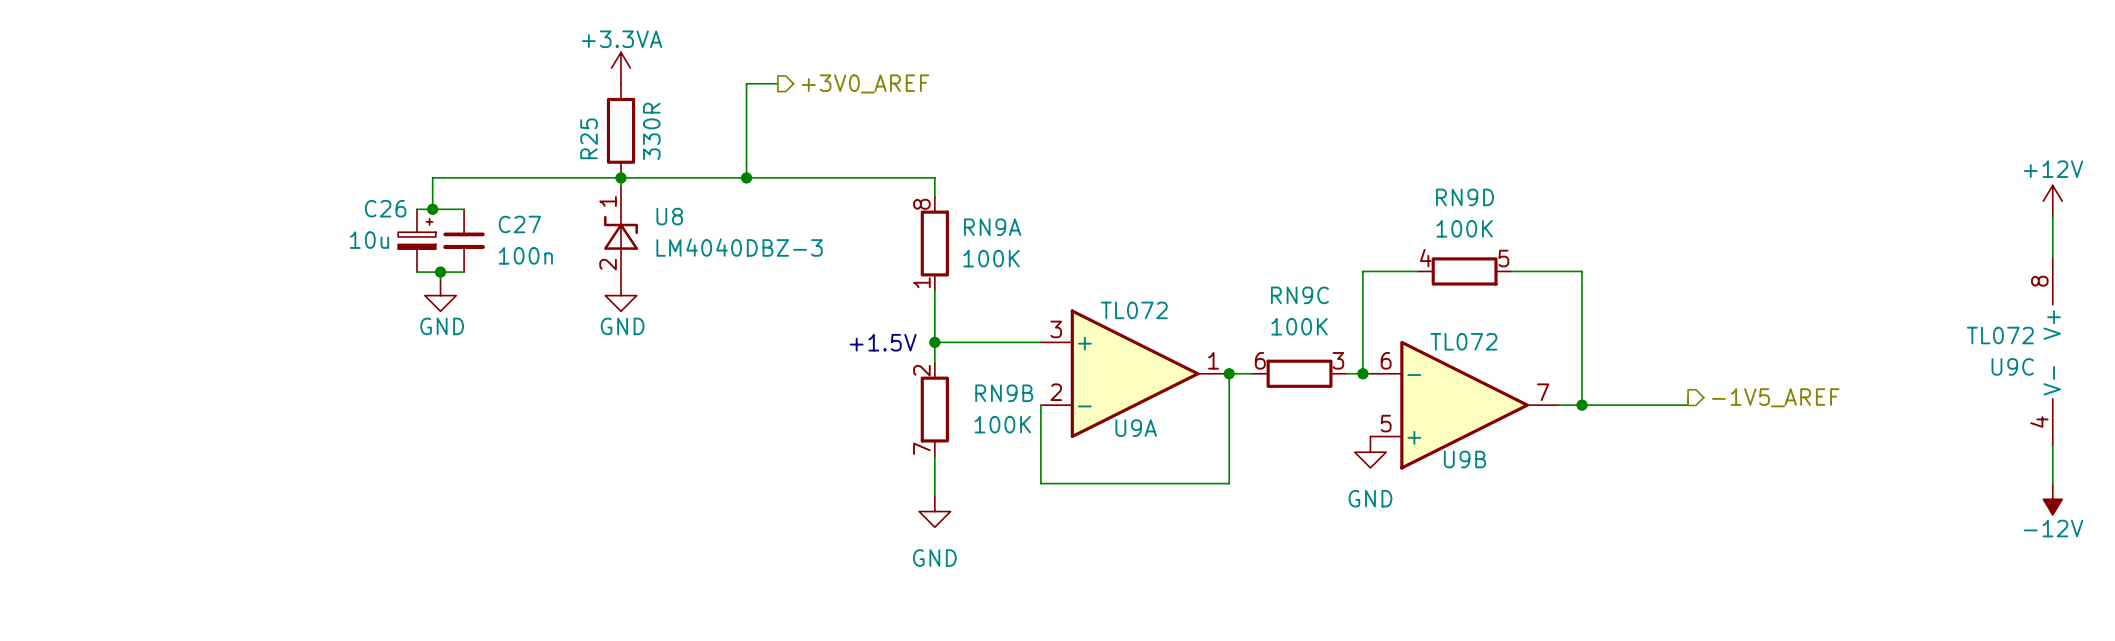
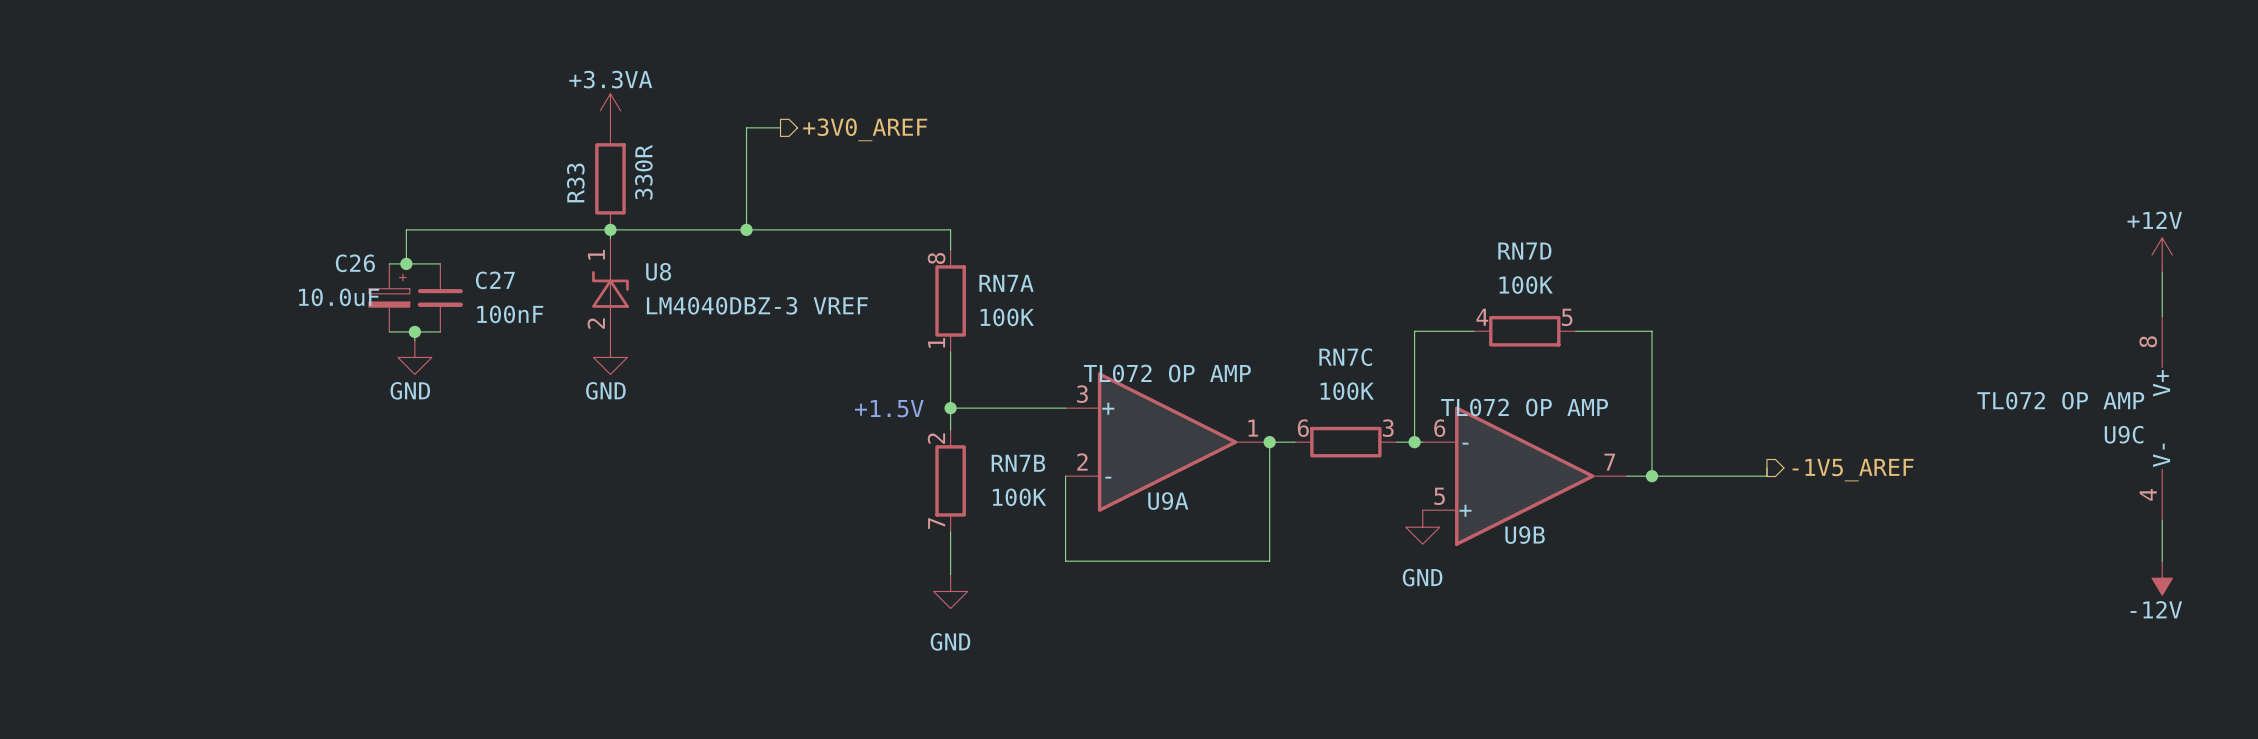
R25 name: R25 (589, 138) -> R33 (575, 183)
RN9D name: RN9D (1464, 197) -> RN7D (1524, 251)
RN9A name: RN9A (992, 227) -> RN7A (1006, 283)
C26 value: 10u (369, 240) -> 10.0uF (339, 297)
U8 value: LM4040DBZ-3 (739, 247) -> LM4040DBZ-3 VREF (757, 305)
C27 value: 100n (525, 255) -> 100nF (510, 314)
RN9C name: RN9C (1299, 295) -> RN7C (1345, 357)
U9A value: TL072 (1134, 310) -> TL072 OP AMP (1167, 373)
U9C value: TL072 (2000, 335) -> TL072 OP AMP (2060, 400)
U9B value: TL072 (1463, 341) -> TL072 OP AMP (1524, 407)
RN9B name: RN9B (1004, 393) -> RN7B (1018, 463)

